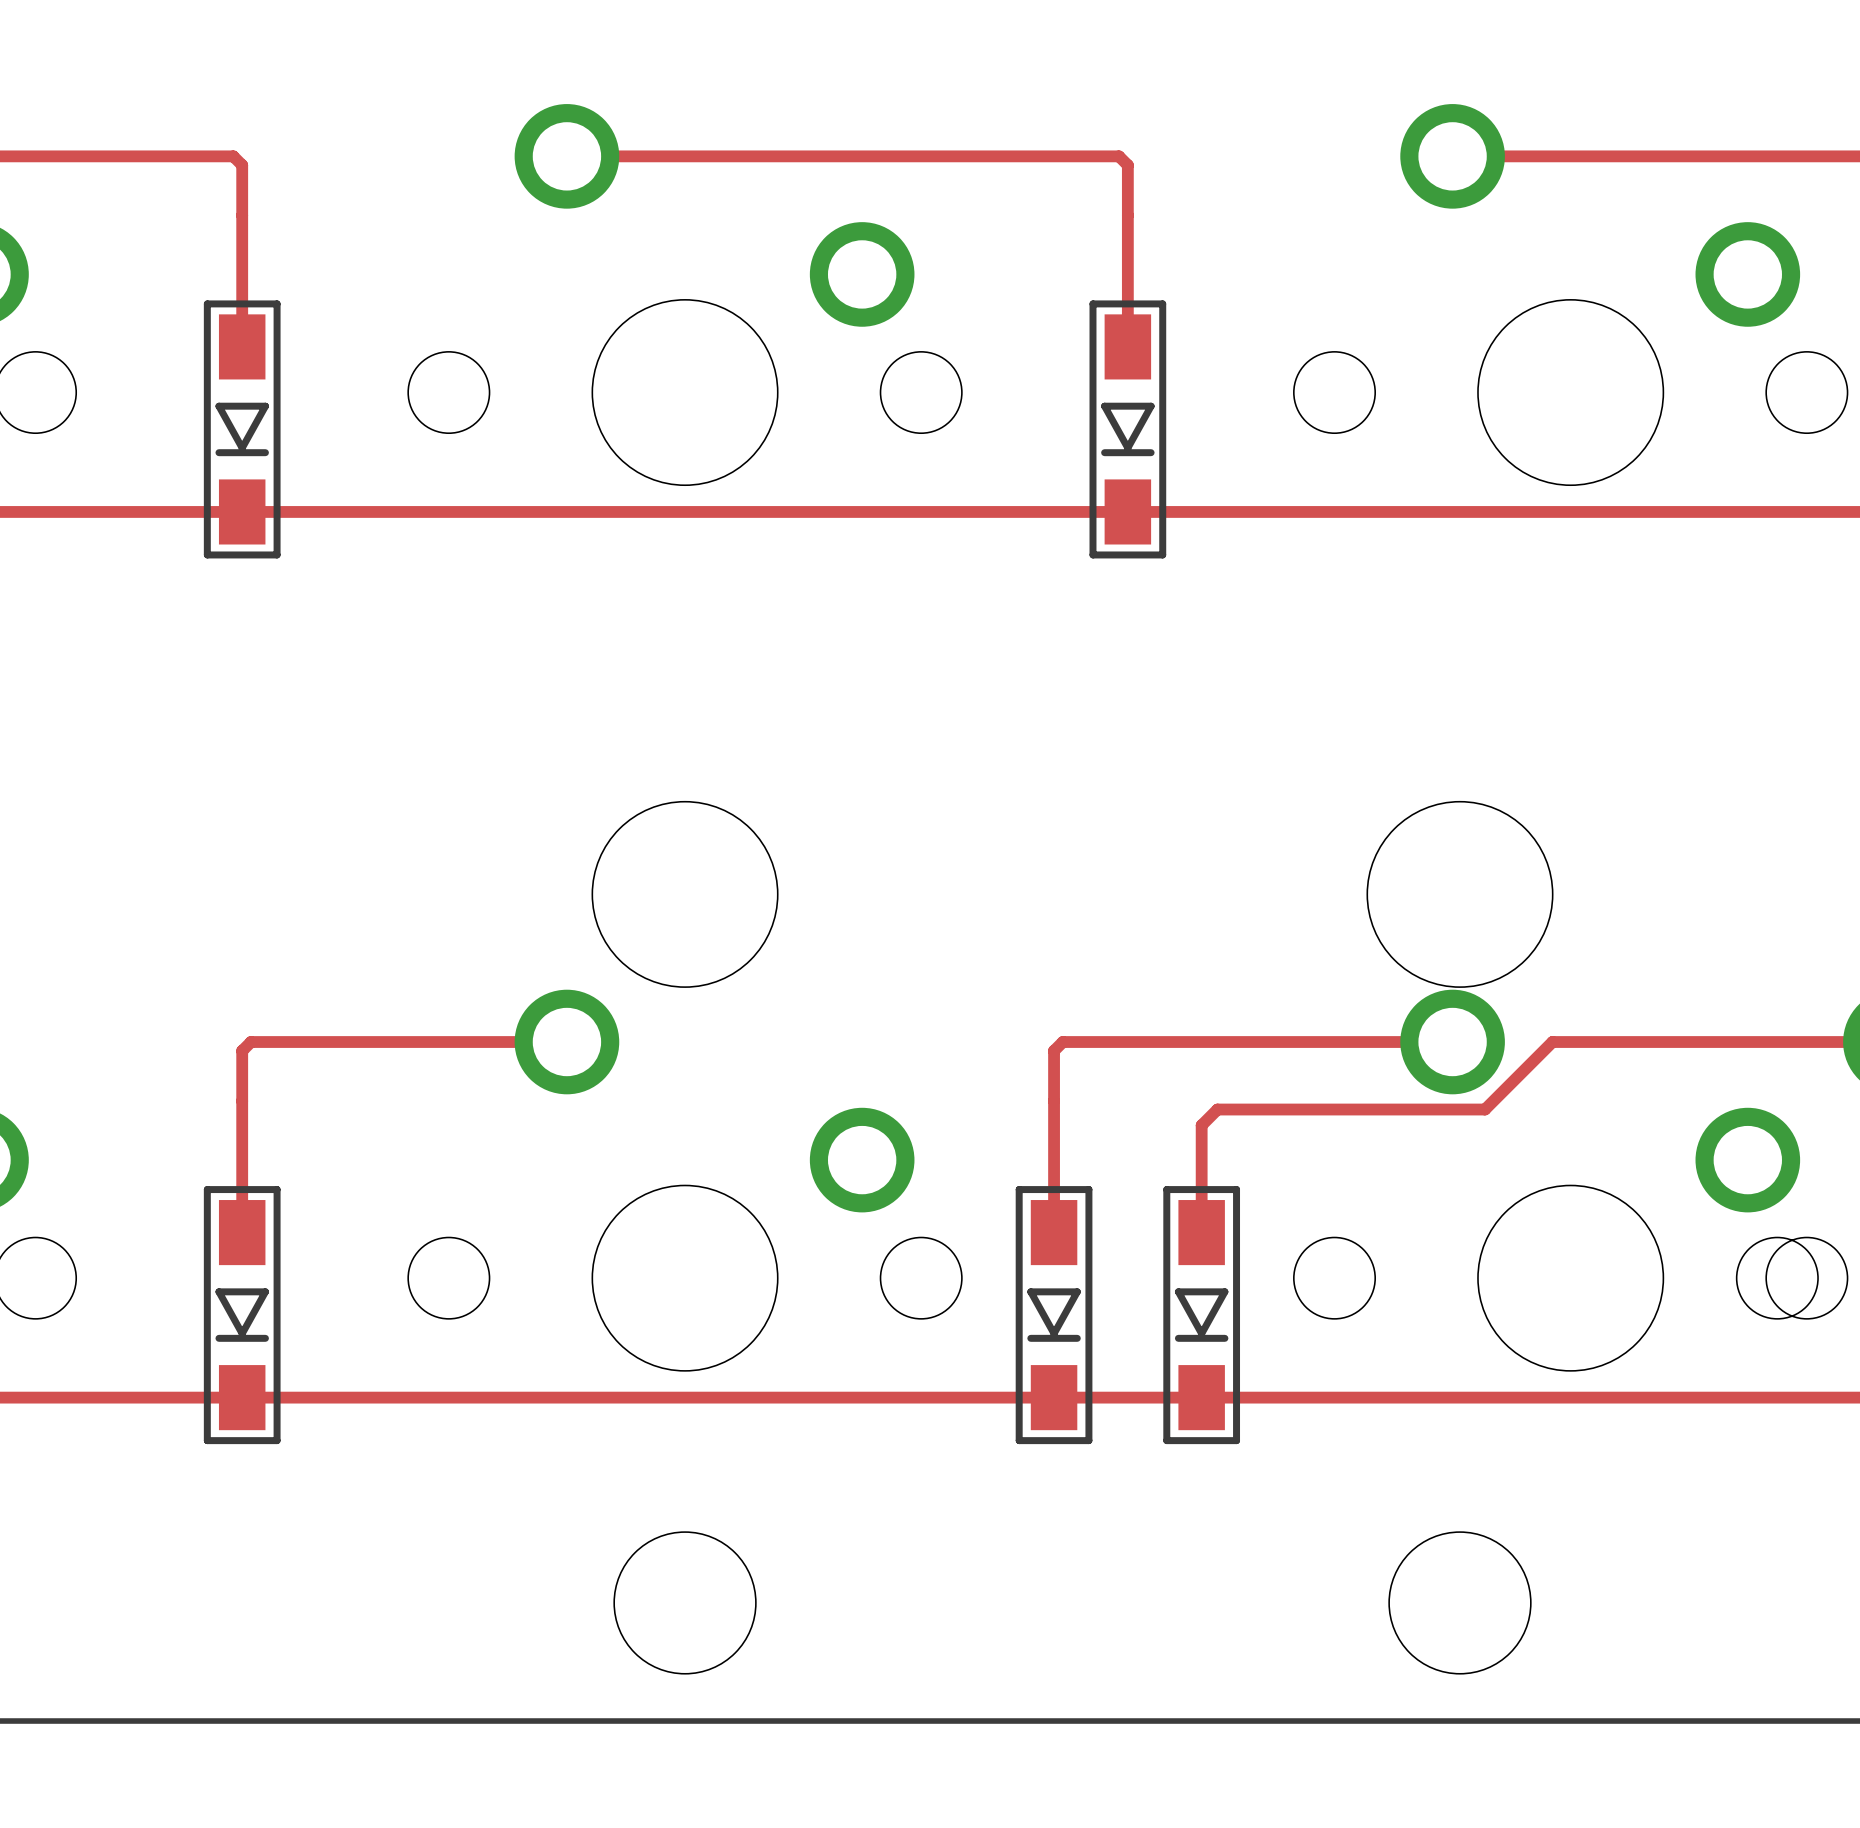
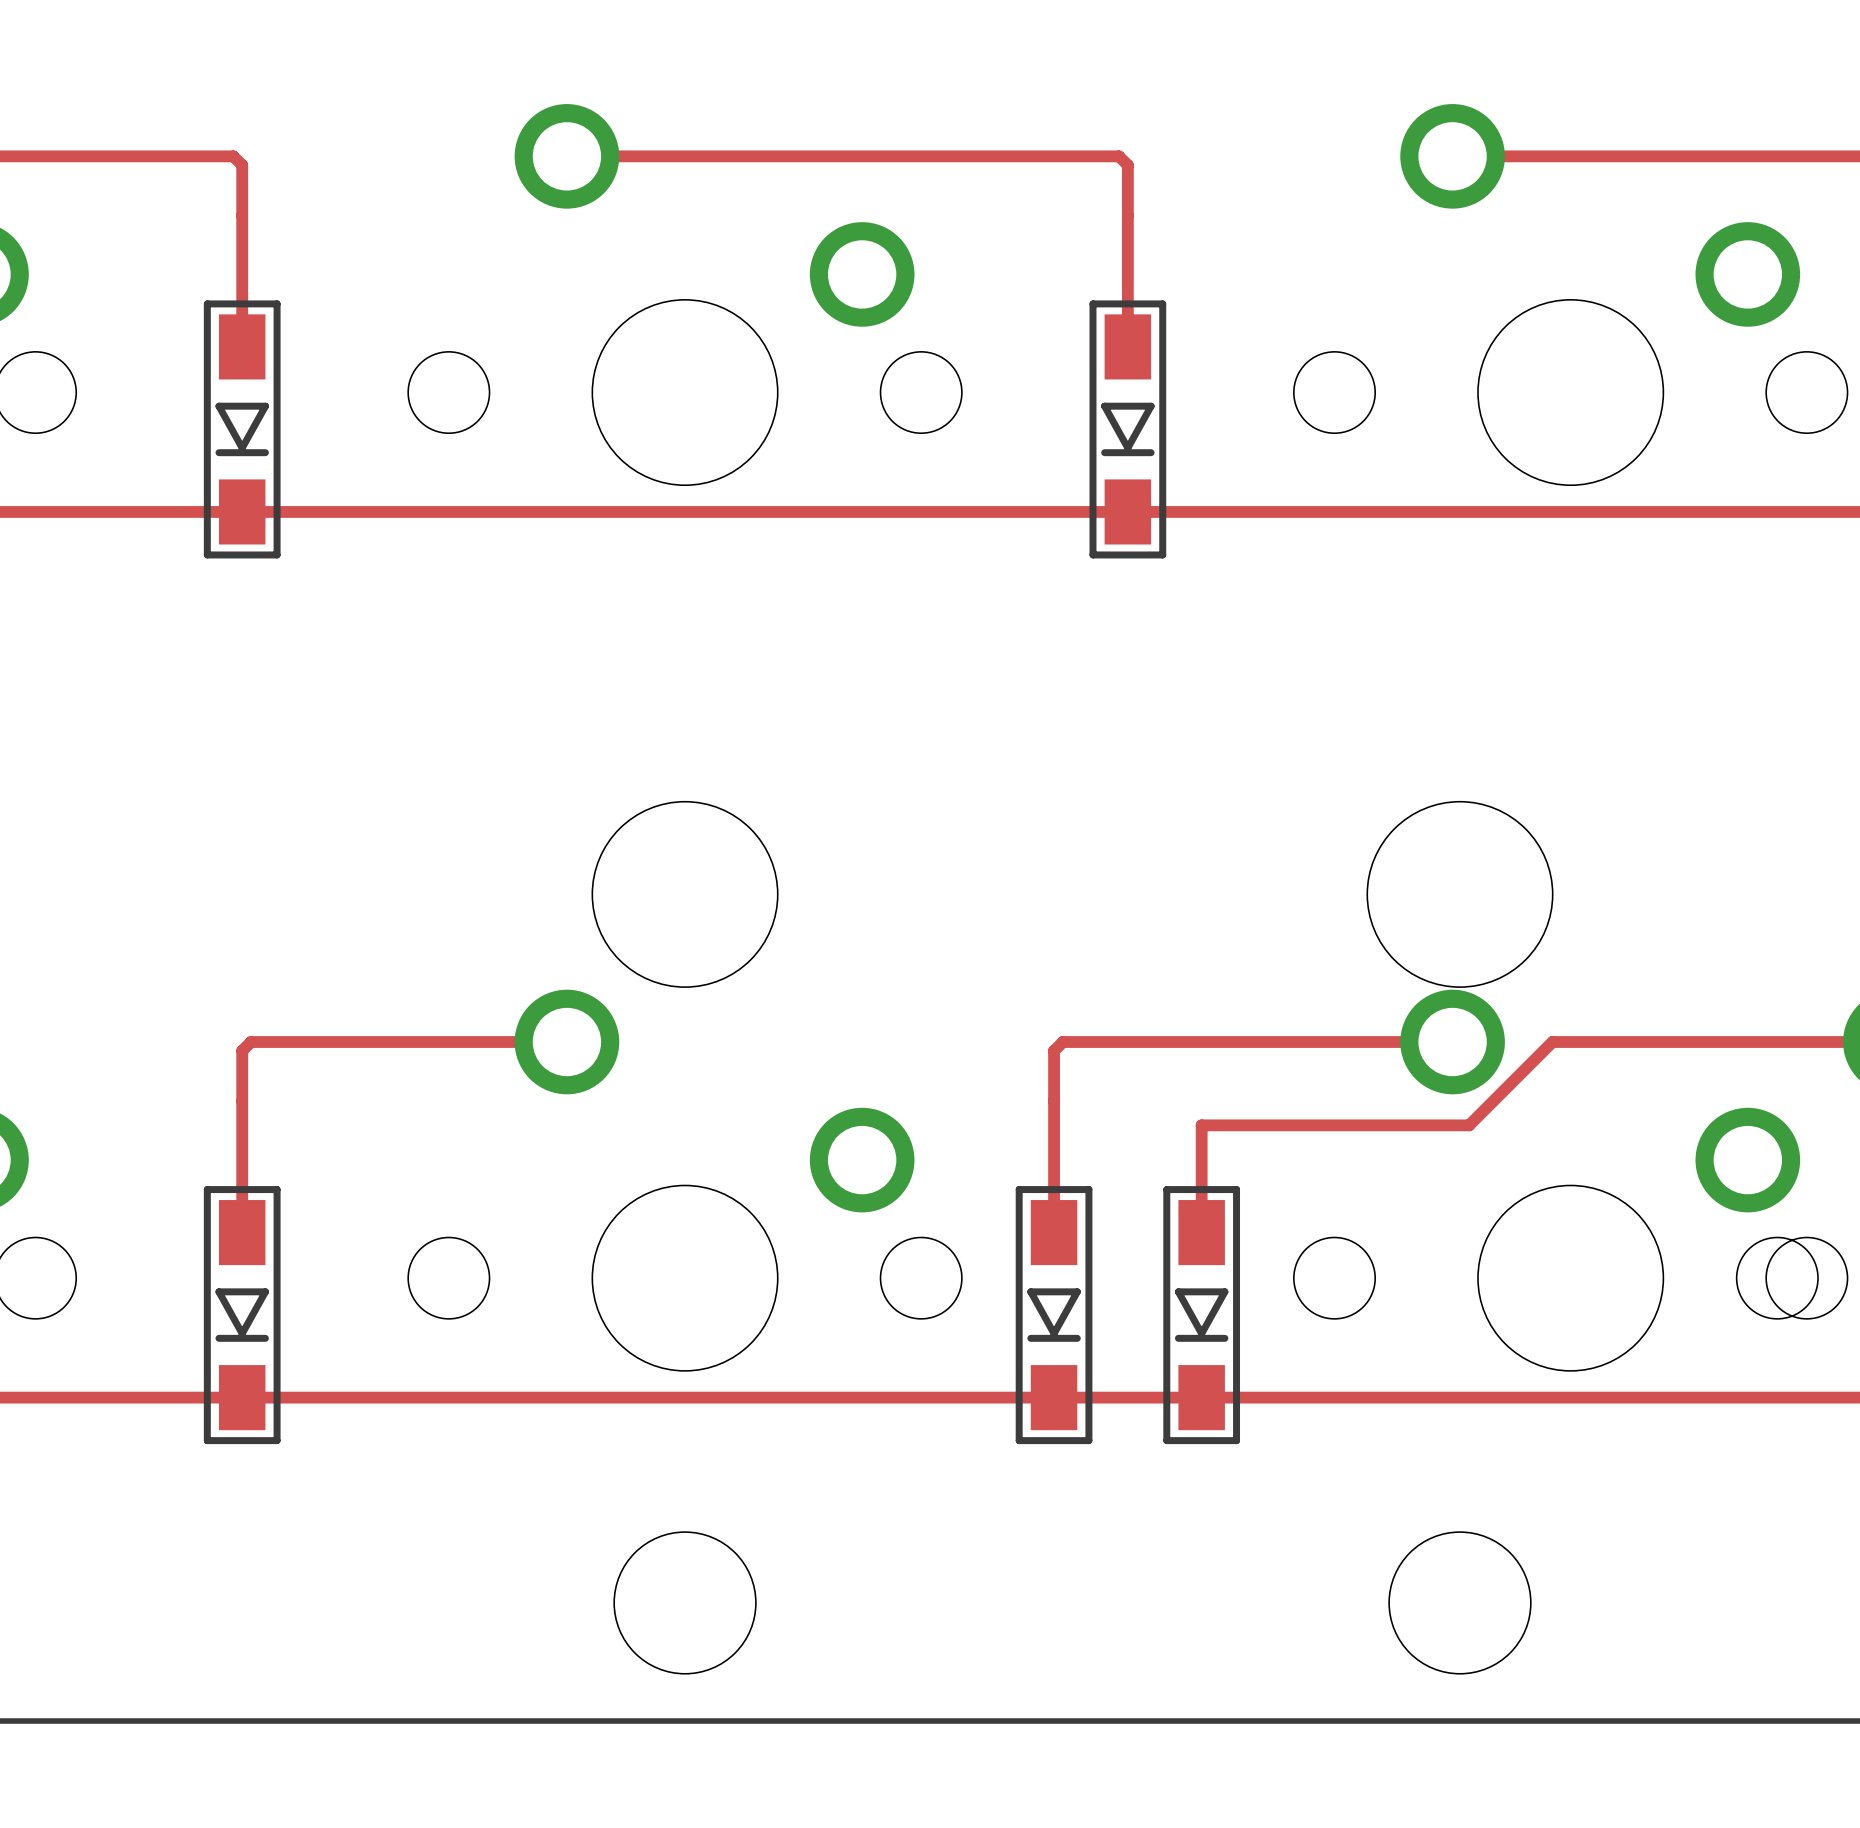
track: (1485, 1109) (1217, 1109) (1201, 1125) -> (1485, 1109) (1469, 1125) (1201, 1125)

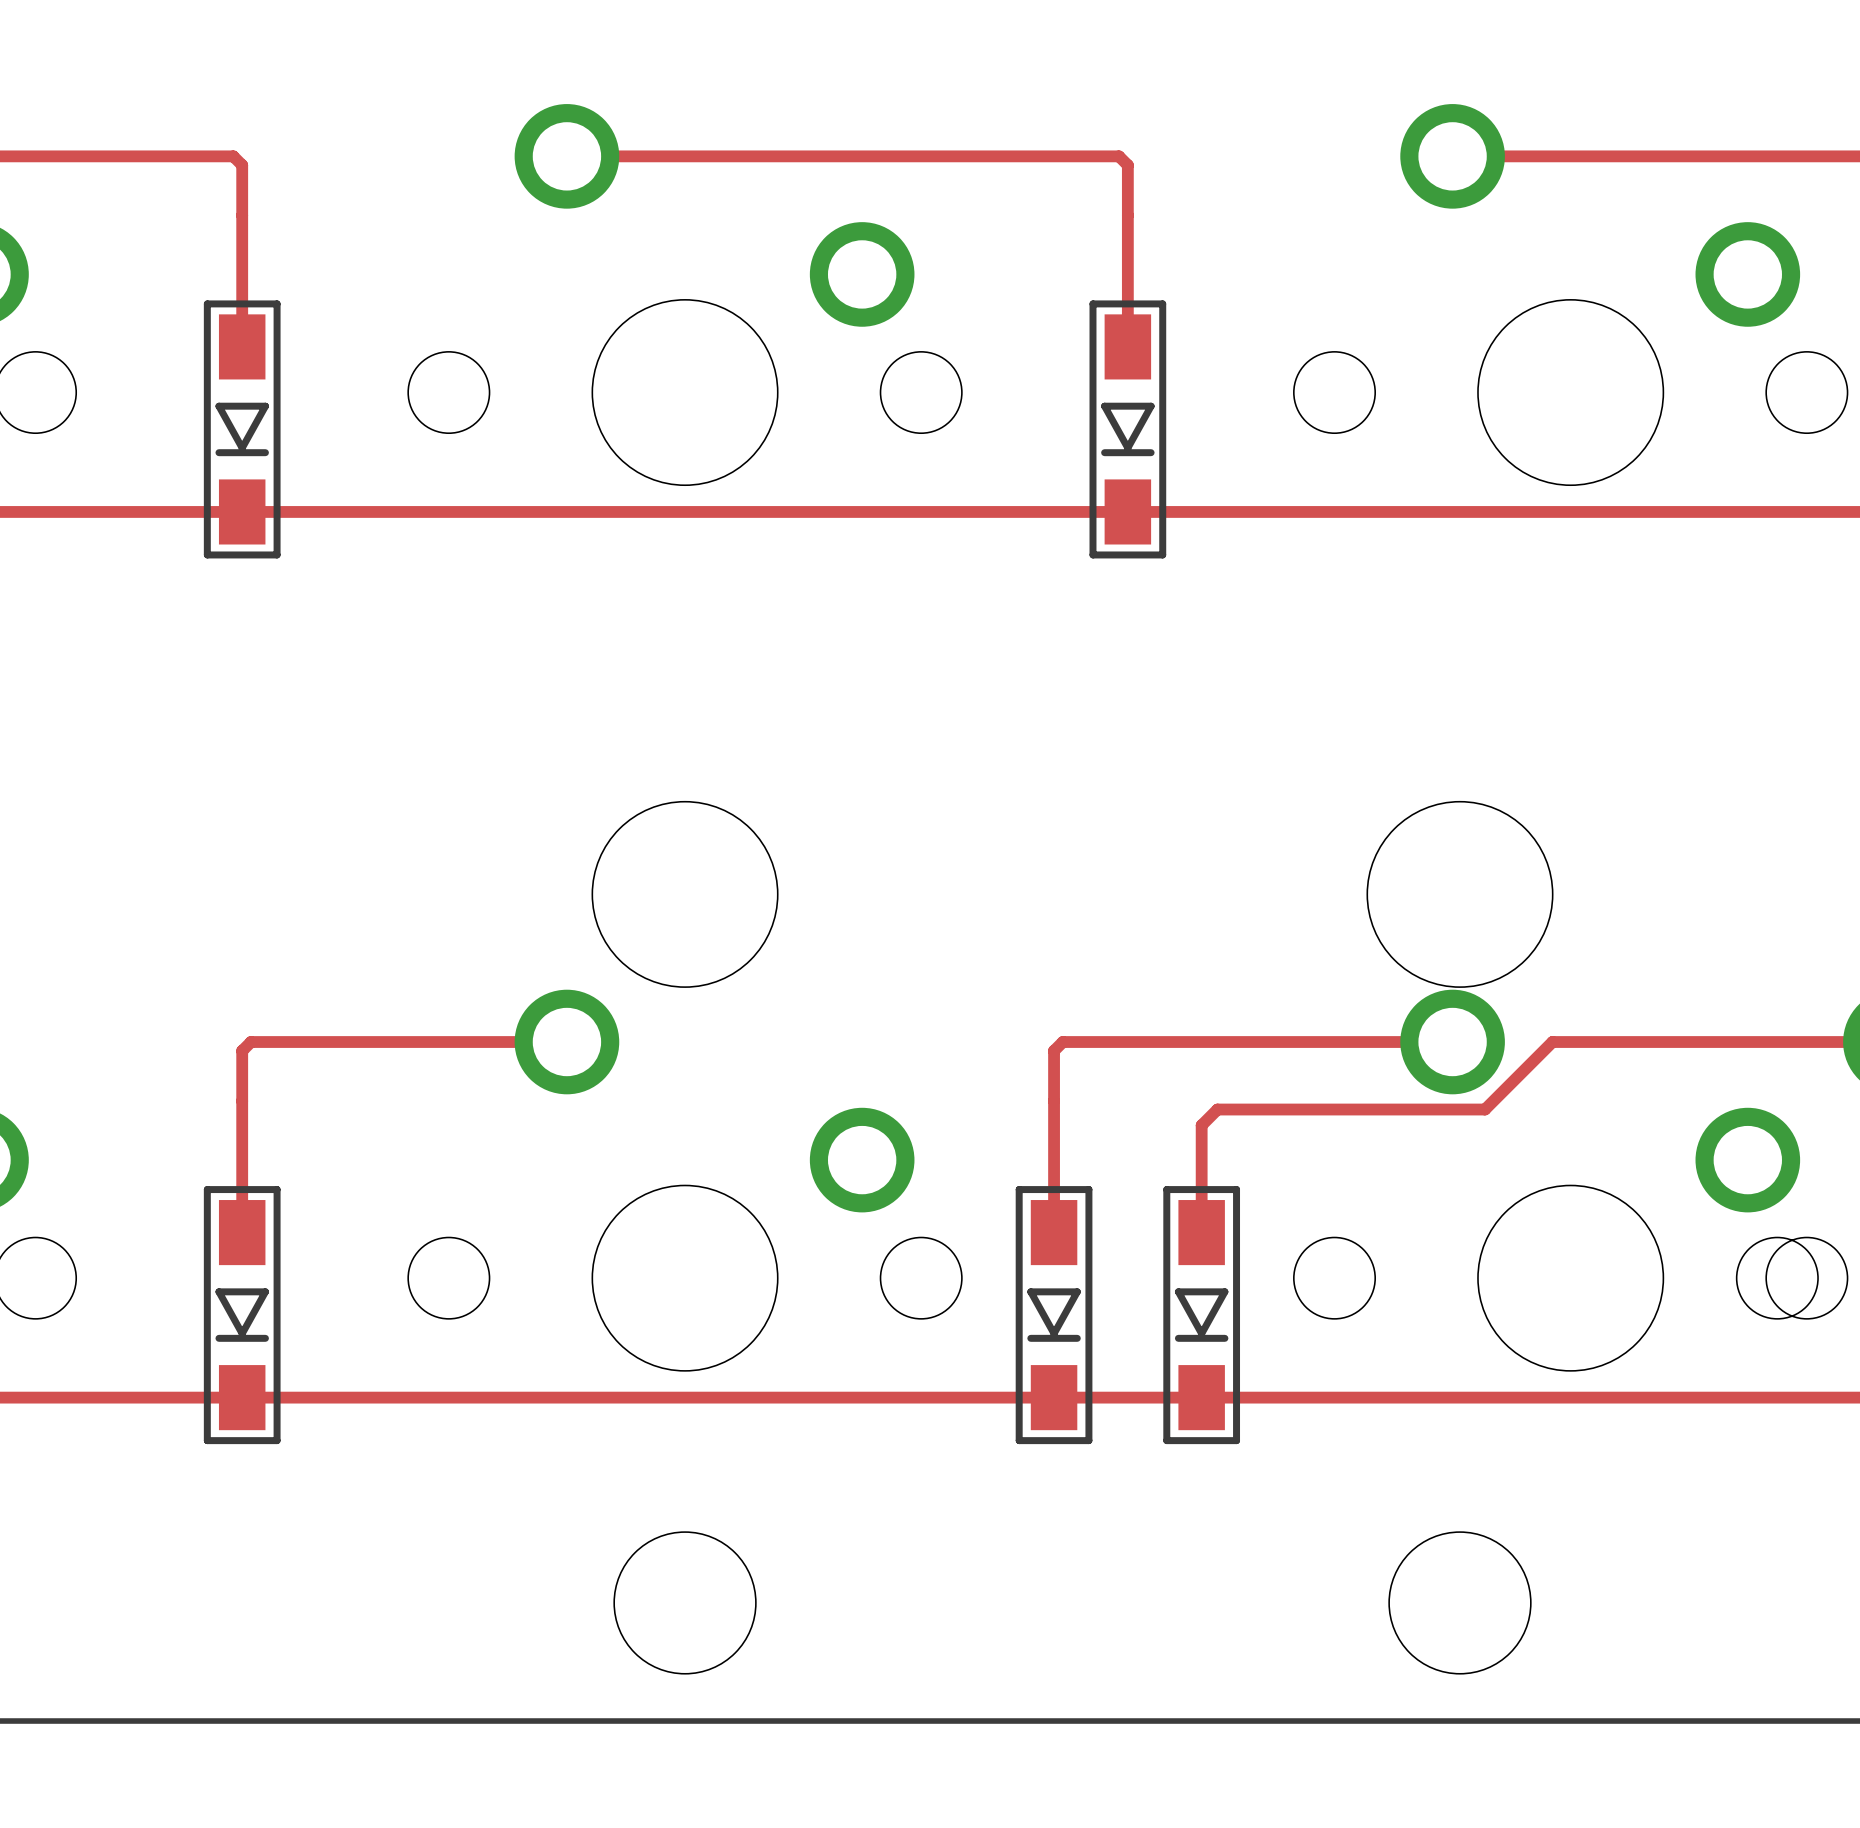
track: (1485, 1109) (1469, 1125) (1201, 1125) -> (1485, 1109) (1217, 1109) (1201, 1125)

